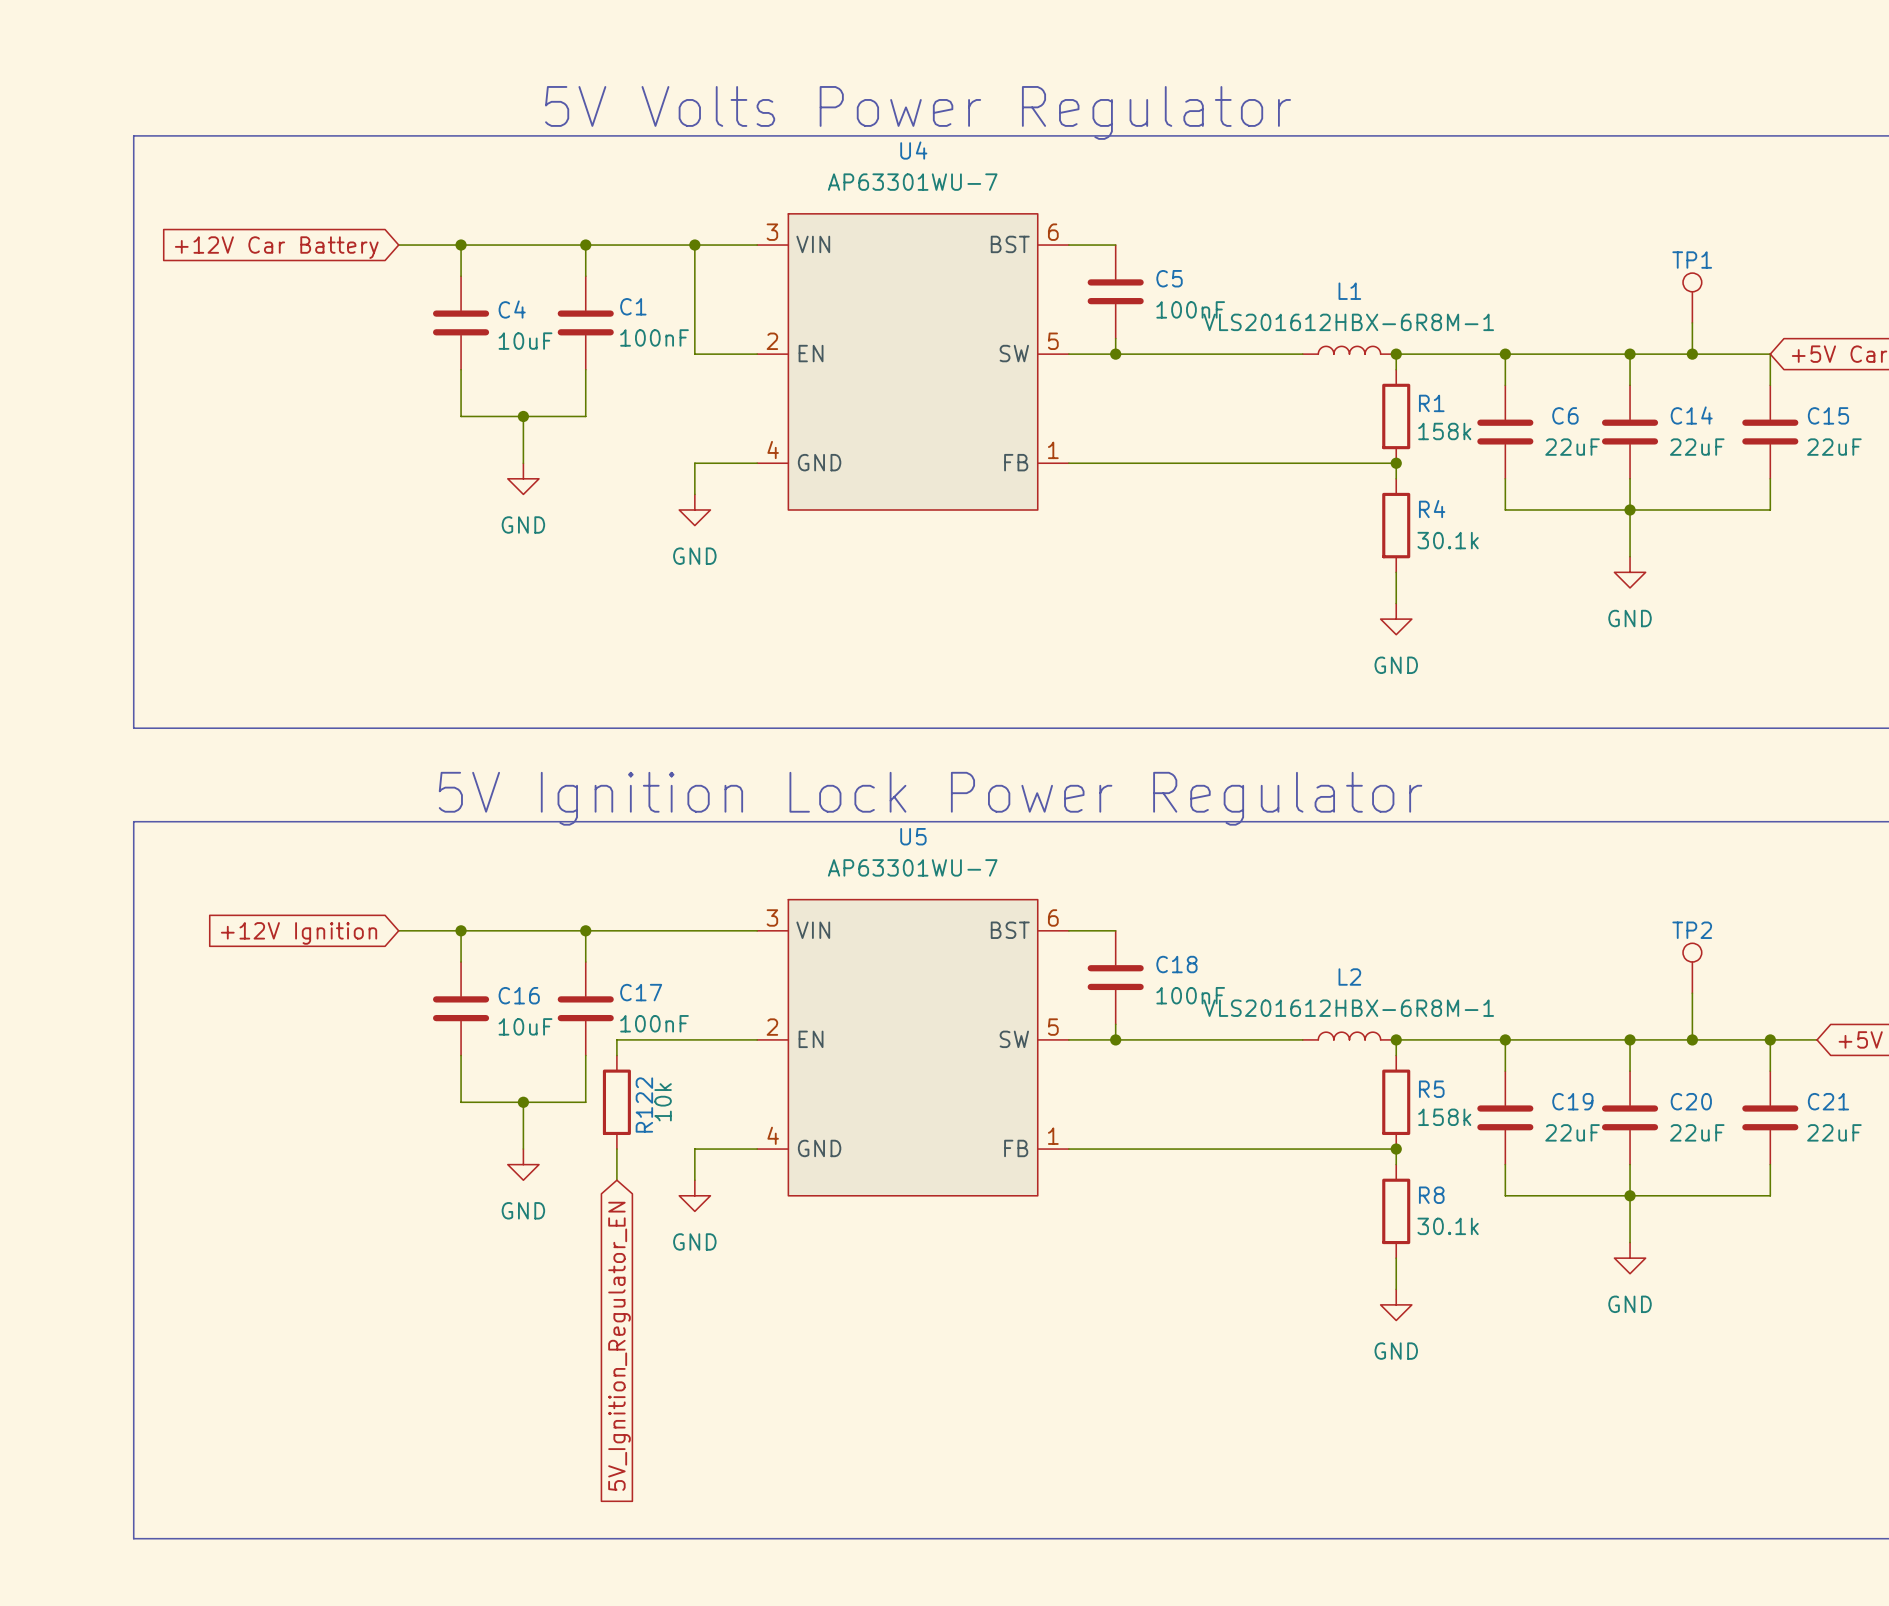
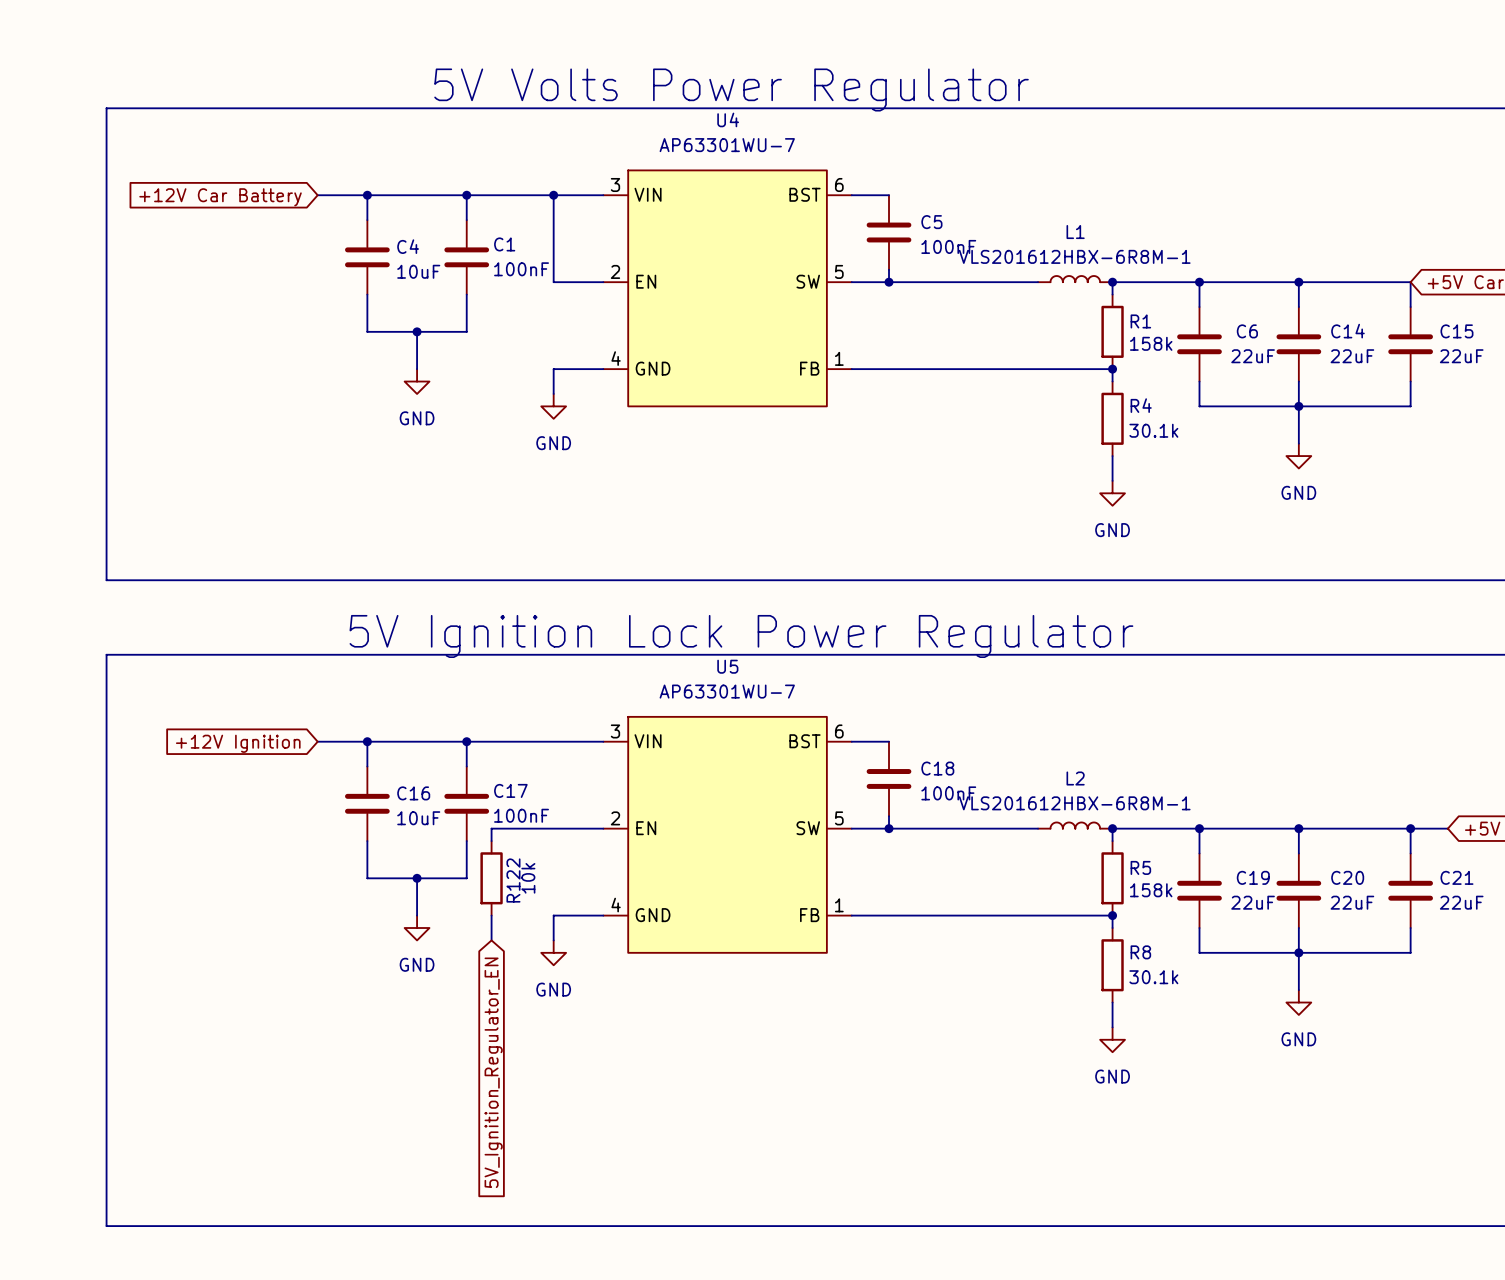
TP1: (1692, 298) -> none
wire: (1692, 322) (1692, 354) -> none
junction: (1692, 354) -> none
TP2: (1692, 968) -> none
wire: (1692, 993) (1692, 1039) -> none
junction: (1692, 1039) -> none

